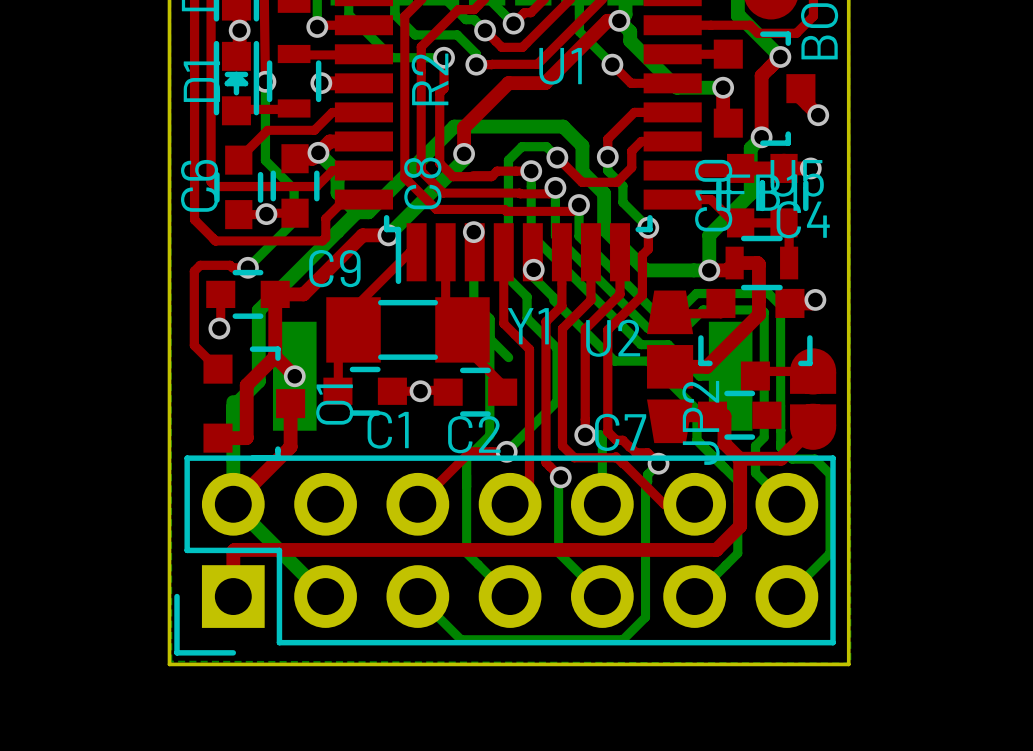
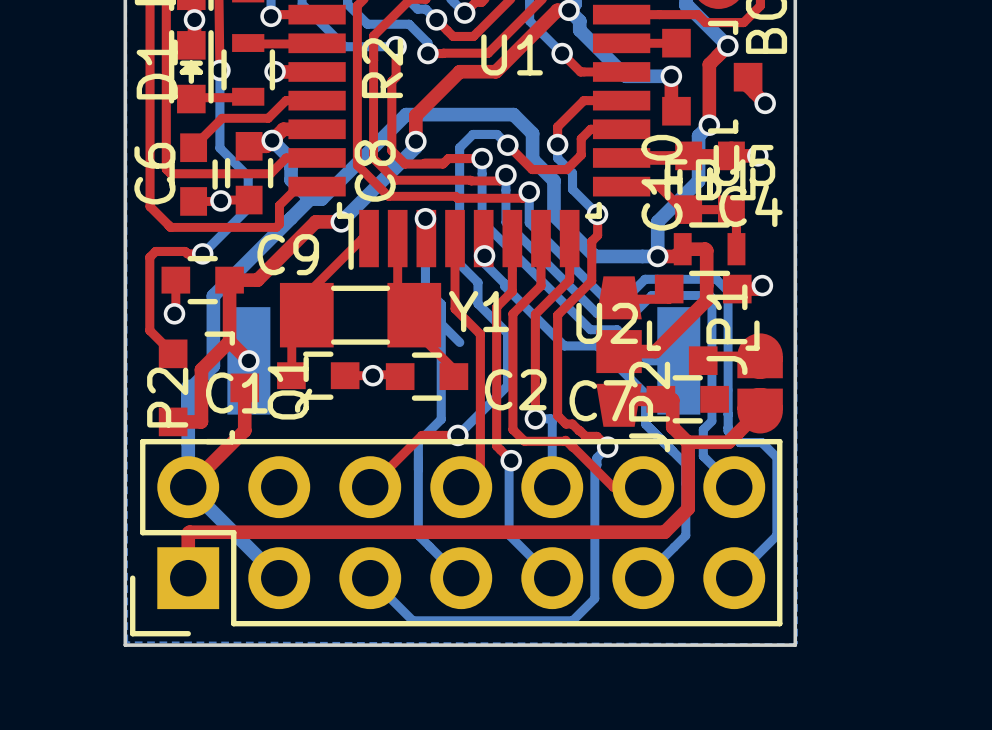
U2 name position: U2 (613, 338) -> U2 (607, 323)
JP1 name: none -> JP1 (726, 329)
P2 name: none -> P2 (167, 397)
C1 name position: C1 (388, 430) -> C1 (236, 393)
C7 name position: C7 (620, 432) -> C7 (601, 400)
C2 name position: C2 (474, 434) -> C2 (515, 389)

